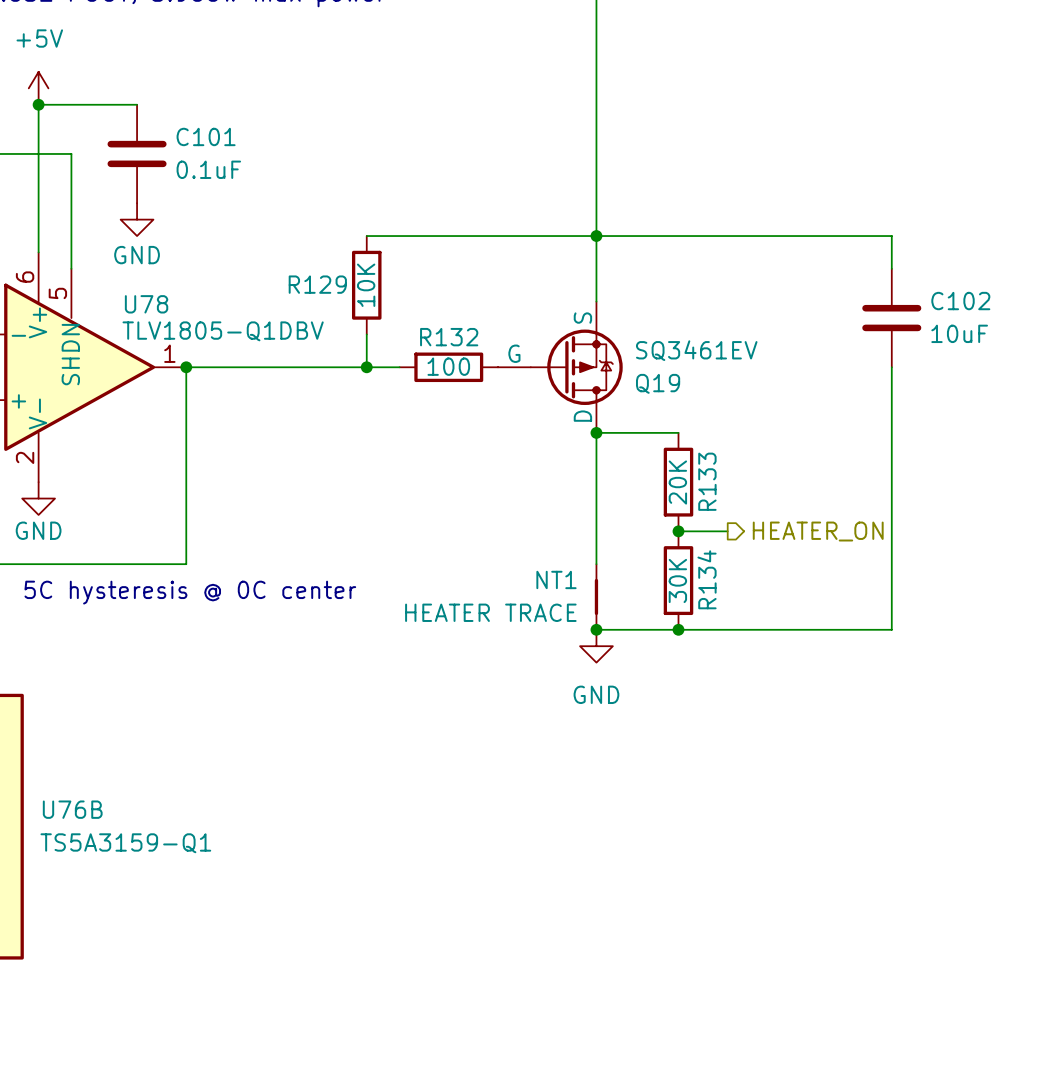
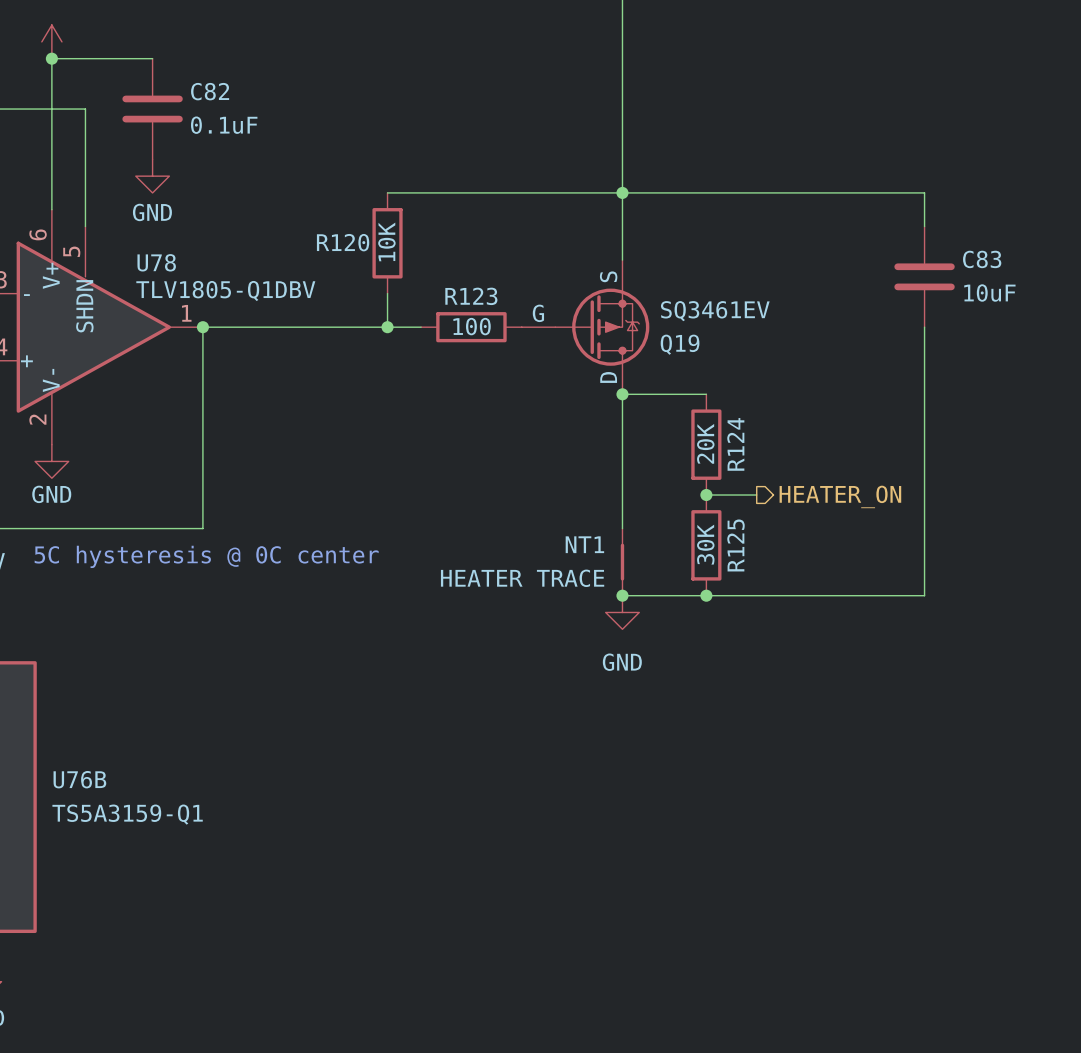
C101 name: C101 (206, 136) -> C82 (210, 91)
R129 name: R129 (317, 284) -> R120 (343, 242)
C102 name: C102 (960, 301) -> C83 (982, 259)
R132 name: R132 (449, 337) -> R123 (471, 296)
R133 name: R133 (707, 481) -> R124 (735, 444)
R134 name: R134 (707, 579) -> R125 (735, 545)

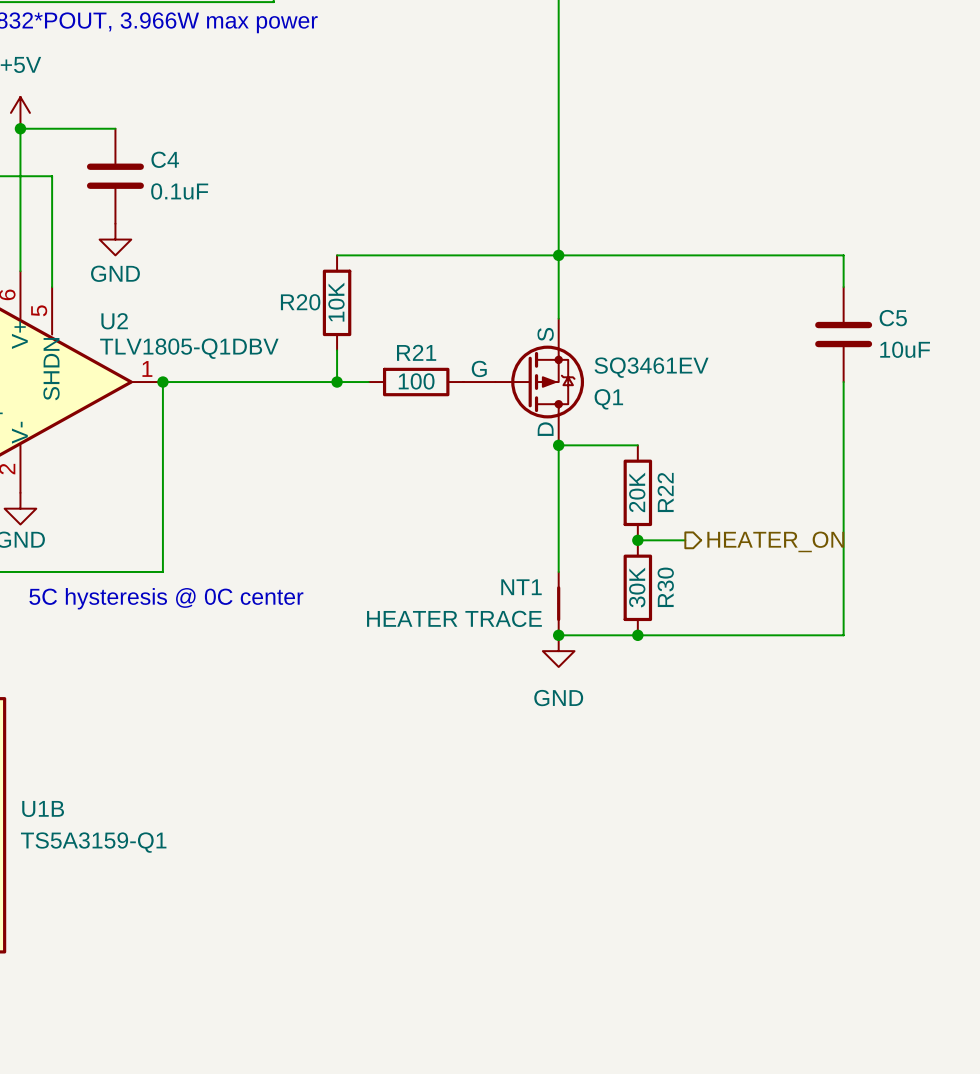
C82 name: C82 (210, 91) -> C4 (165, 159)
R120 name: R120 (343, 242) -> R20 (300, 302)
C83 name: C83 (982, 259) -> C5 (893, 318)
U78 name: U78 (156, 262) -> U2 (114, 321)
R123 name: R123 (471, 296) -> R21 (416, 352)
Q19 name: Q19 (680, 344) -> Q1 (608, 399)
R124 name: R124 (735, 444) -> R22 (665, 492)
R125 name: R125 (735, 545) -> R30 (665, 587)
U76B name: U76B (79, 779) -> U1B (43, 808)

